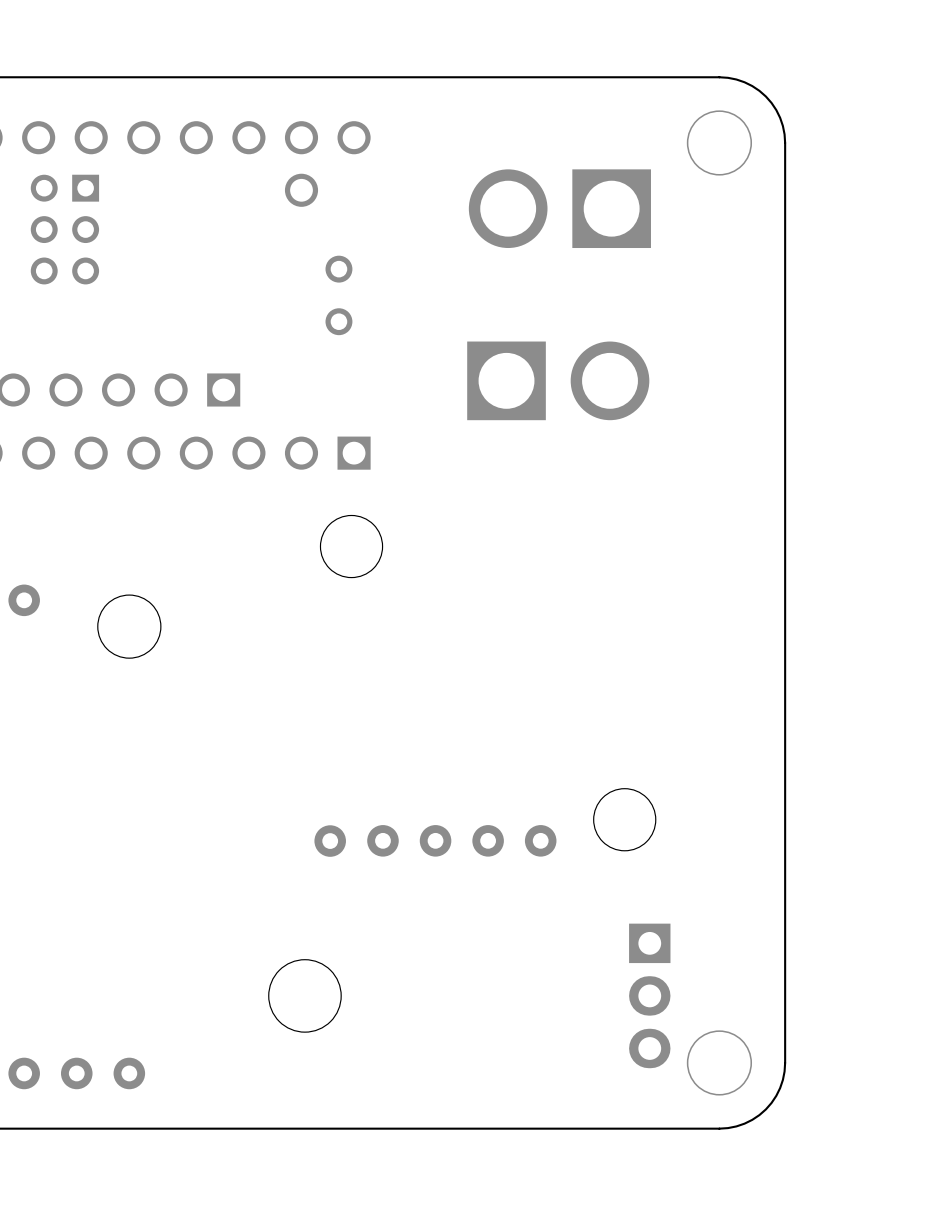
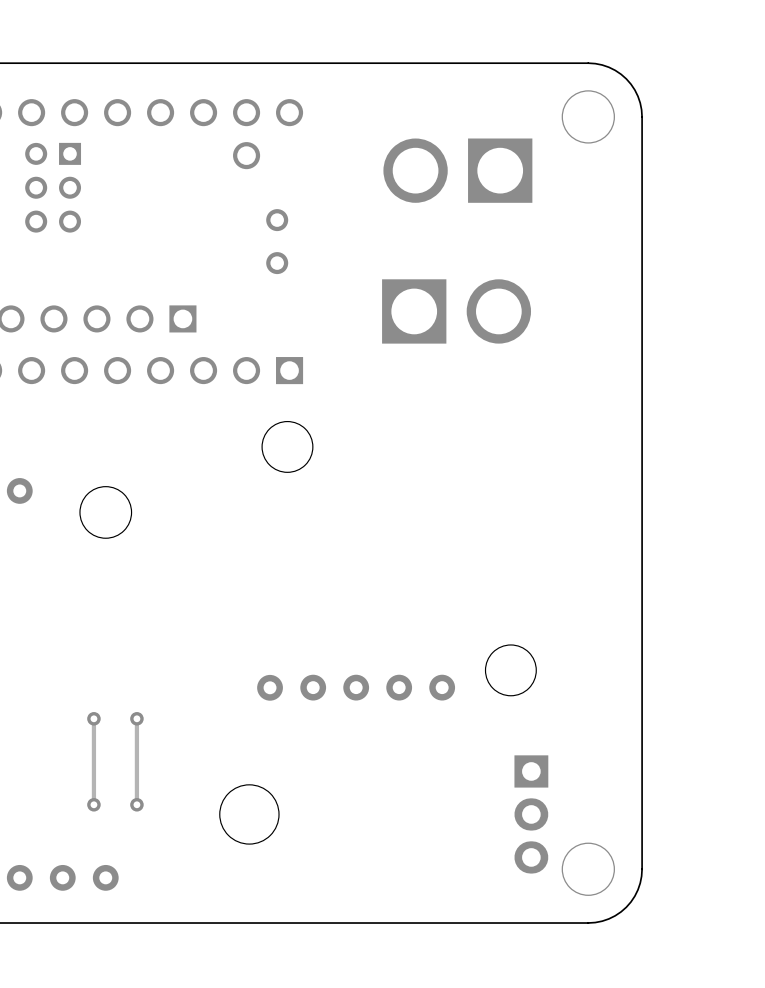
track: none -> (93, 718) (93, 804)
via: none -> (93, 718)
track: none -> (136, 718) (136, 804)
via: none -> (136, 718)
via: none -> (93, 804)
via: none -> (136, 804)

